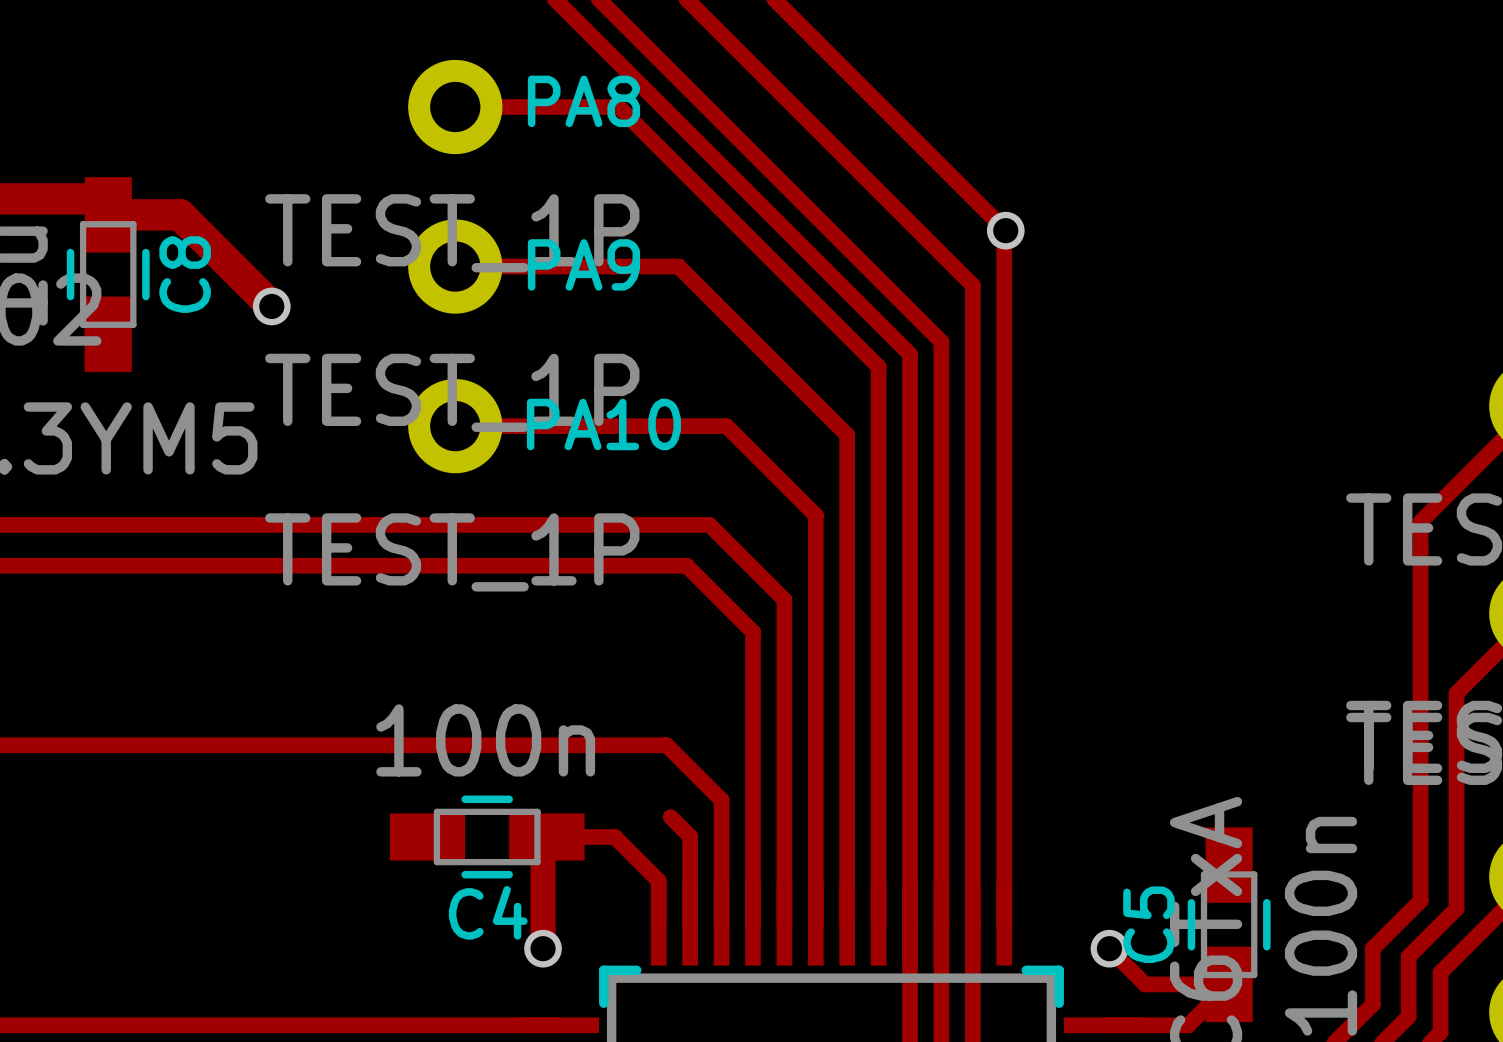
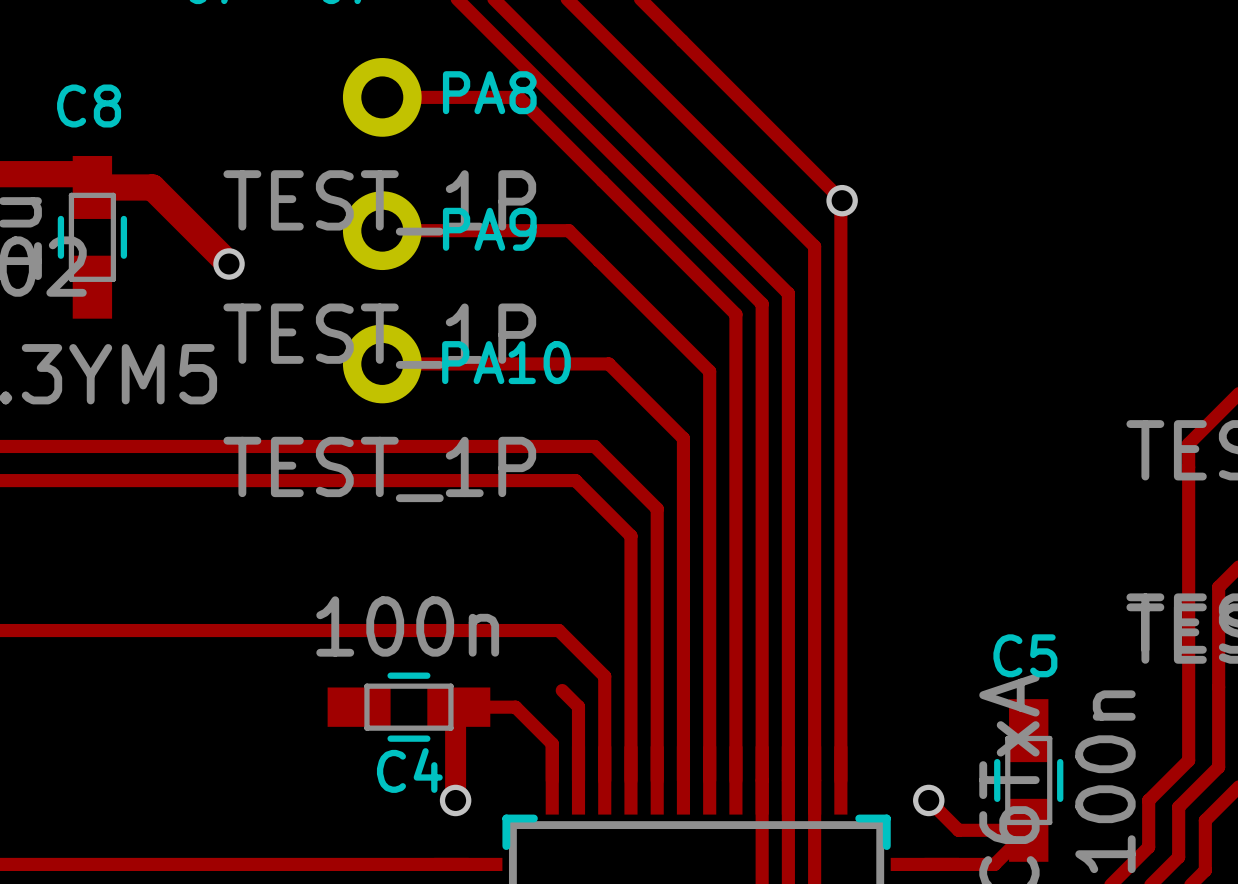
C8 name rotation: 0° (185, 274) -> 90° clockwise (89, 106)
C8 name position: C8 (185, 274) -> C8 (89, 106)
C5 name rotation: 0° (1148, 924) -> 90° clockwise (1025, 655)
C5 name position: C5 (1148, 924) -> C5 (1025, 655)

